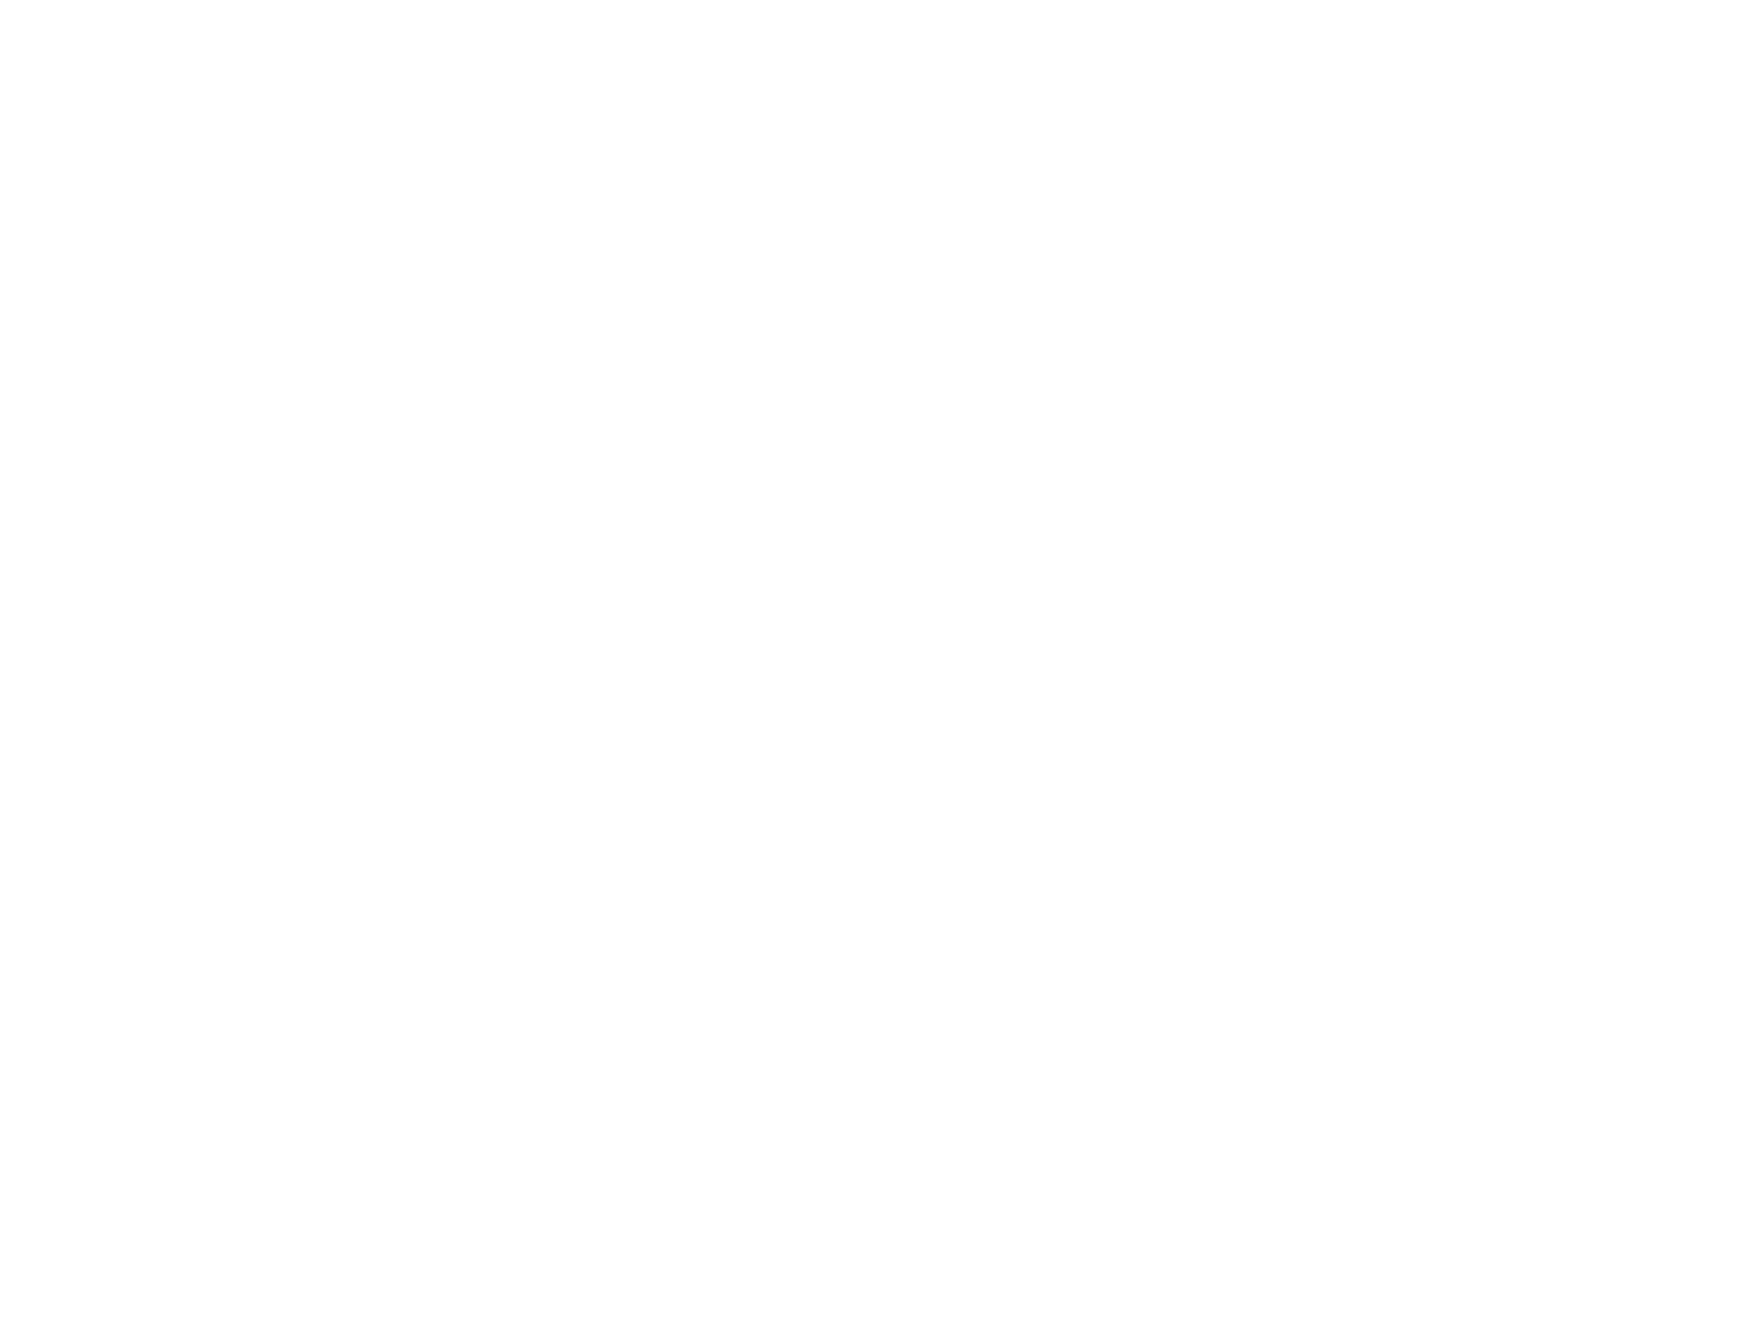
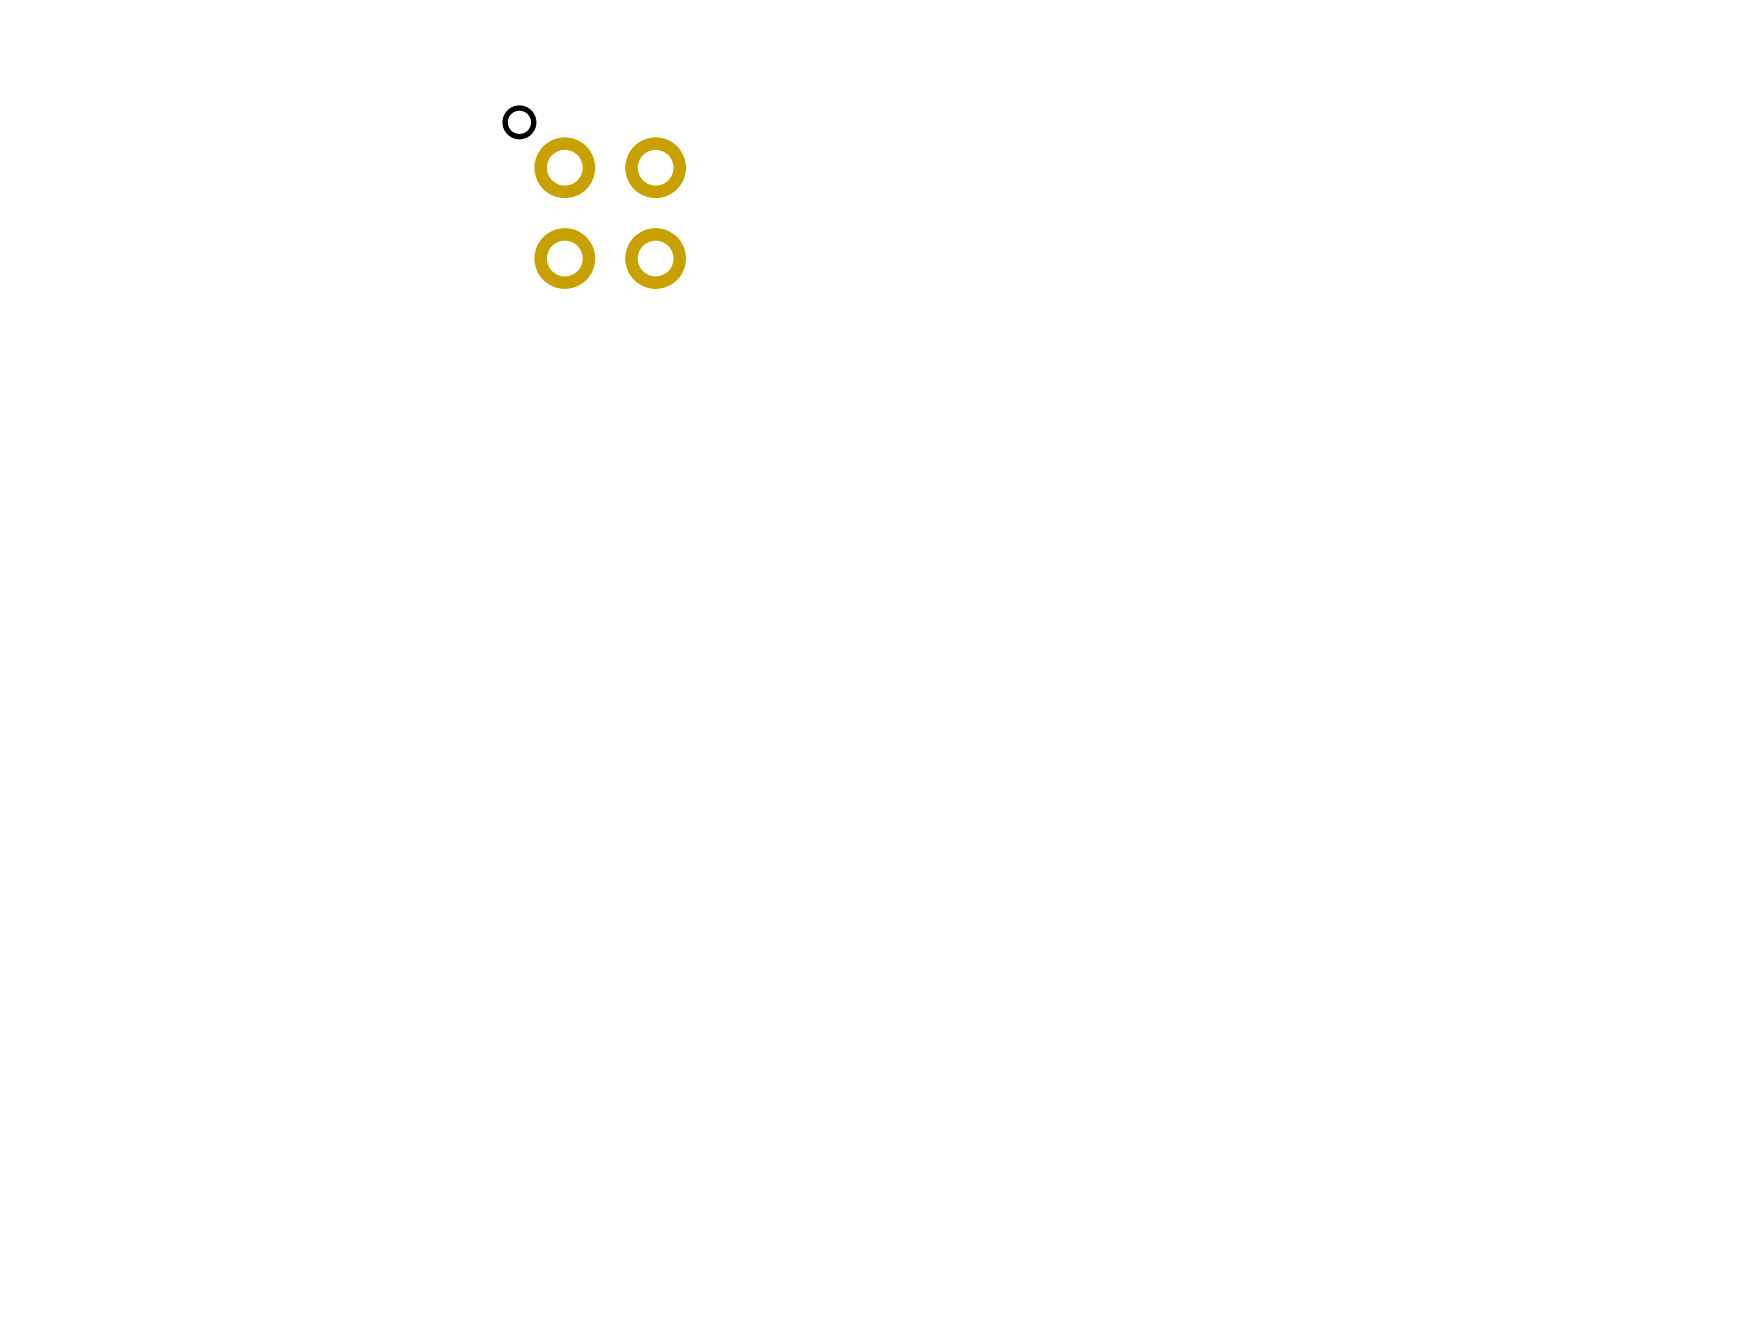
part: none -> (594, 197)

